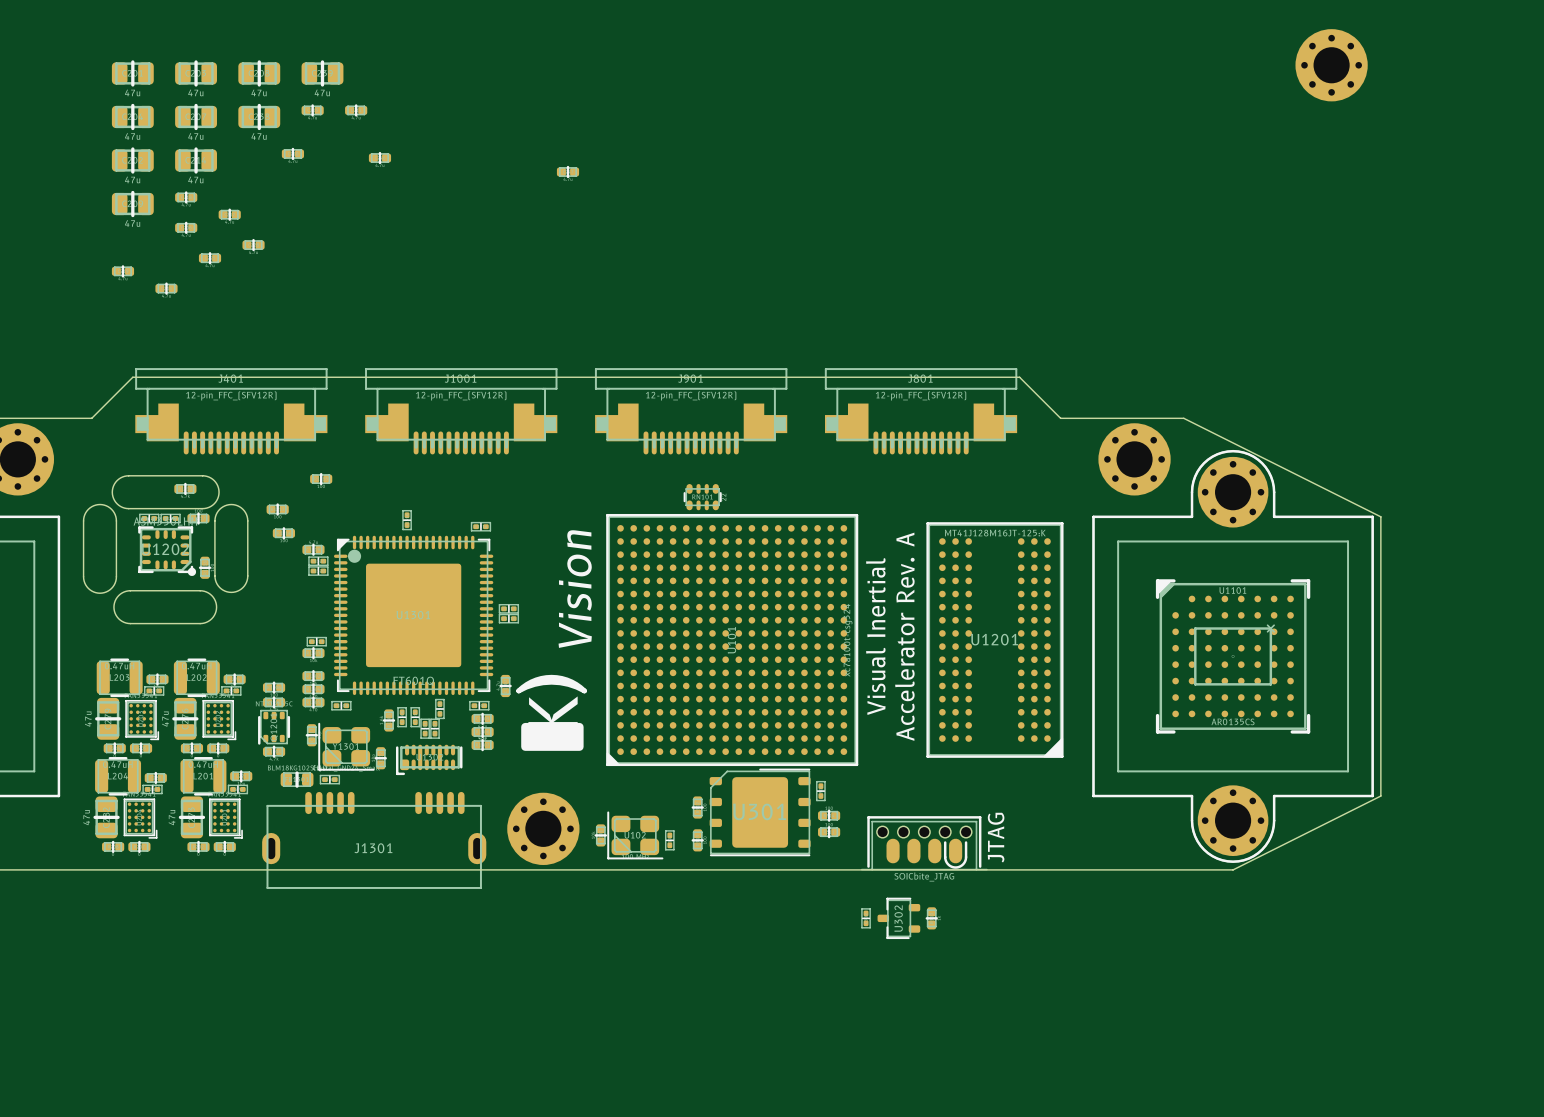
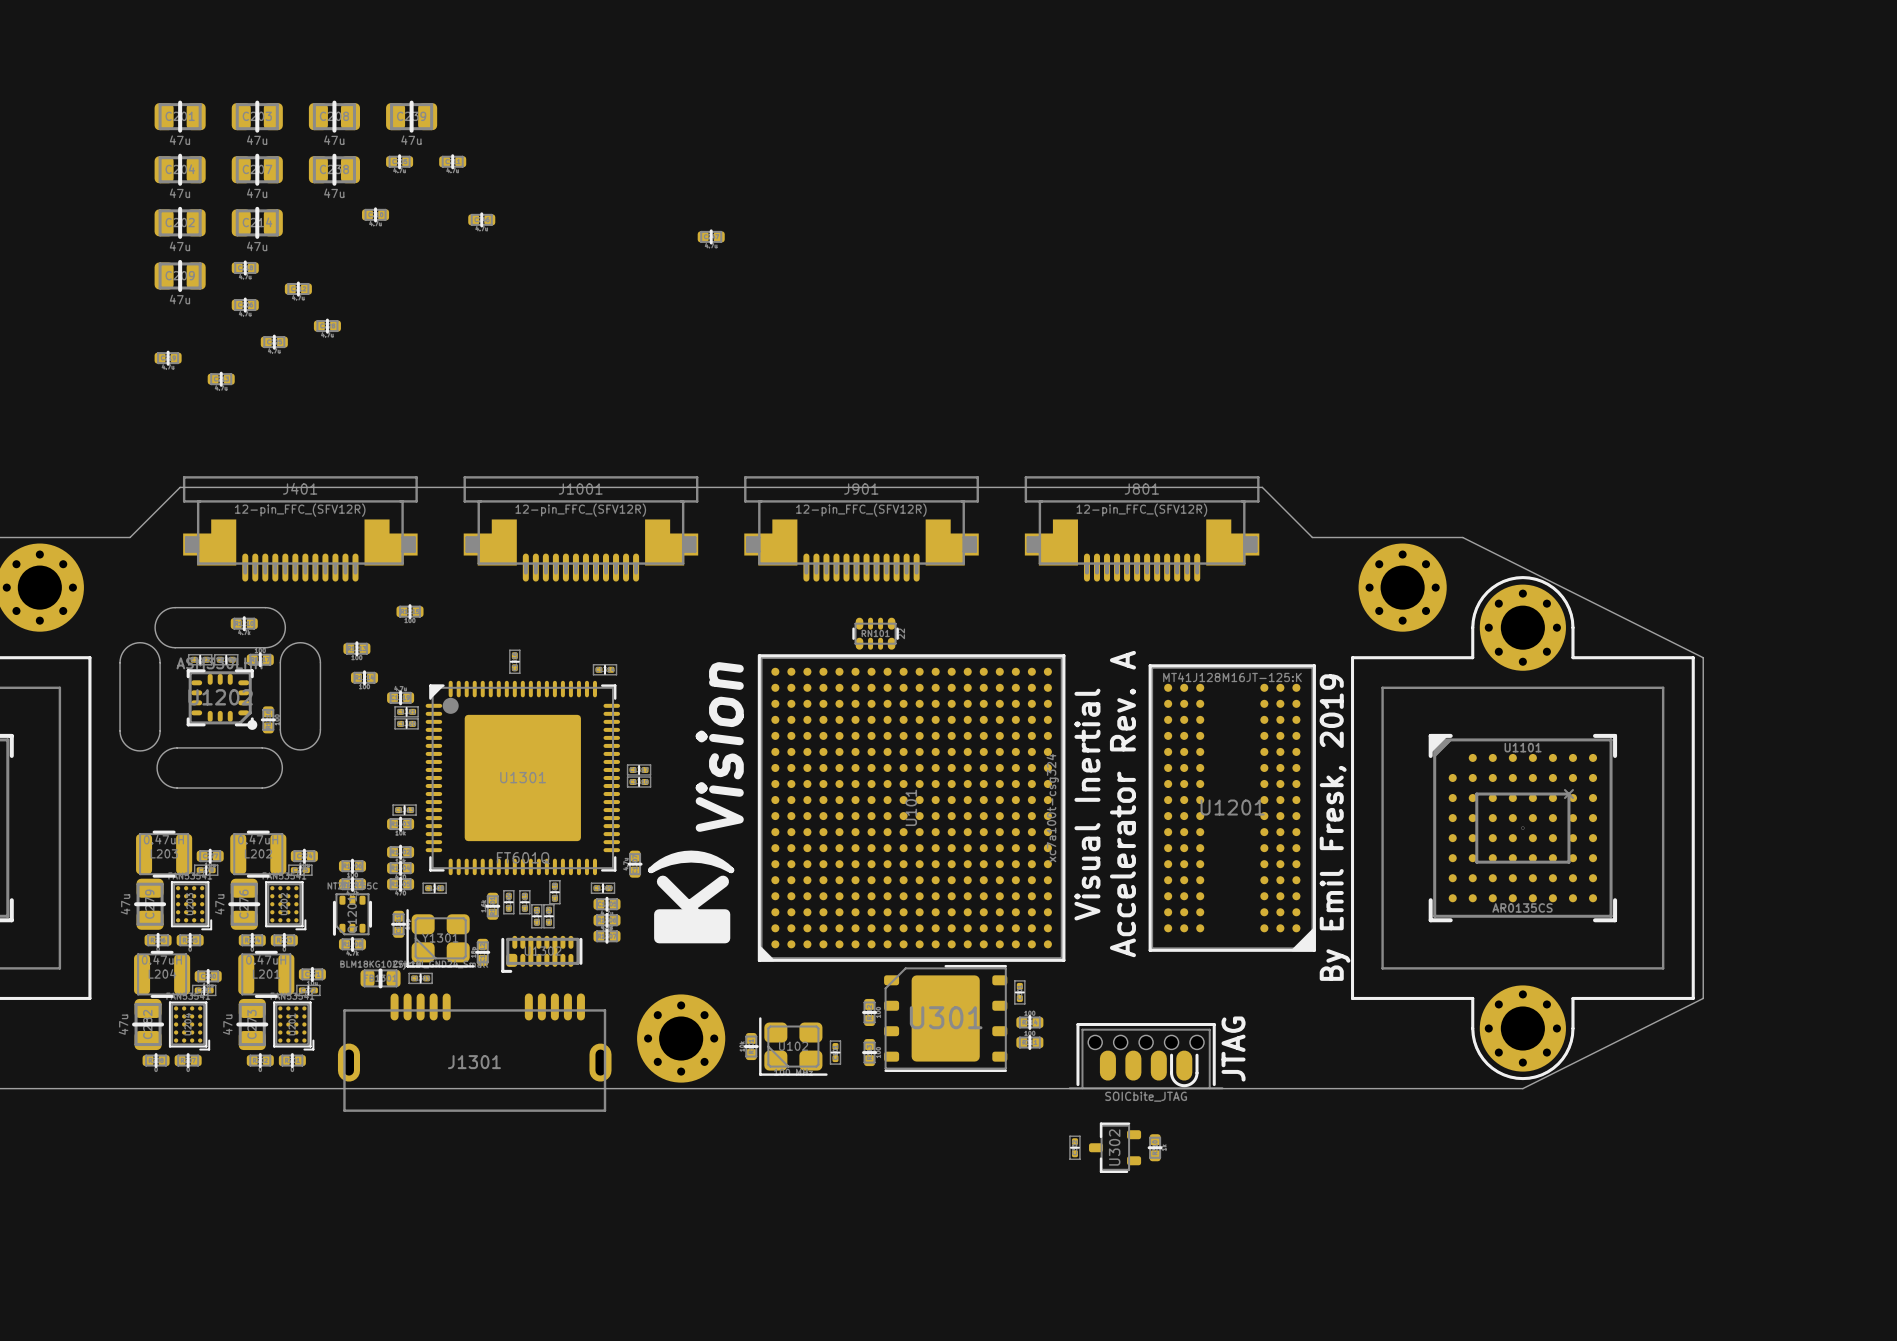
part: (1331, 65) -> none
text: none -> By Emil Fresk, 2019 (1335, 827)

